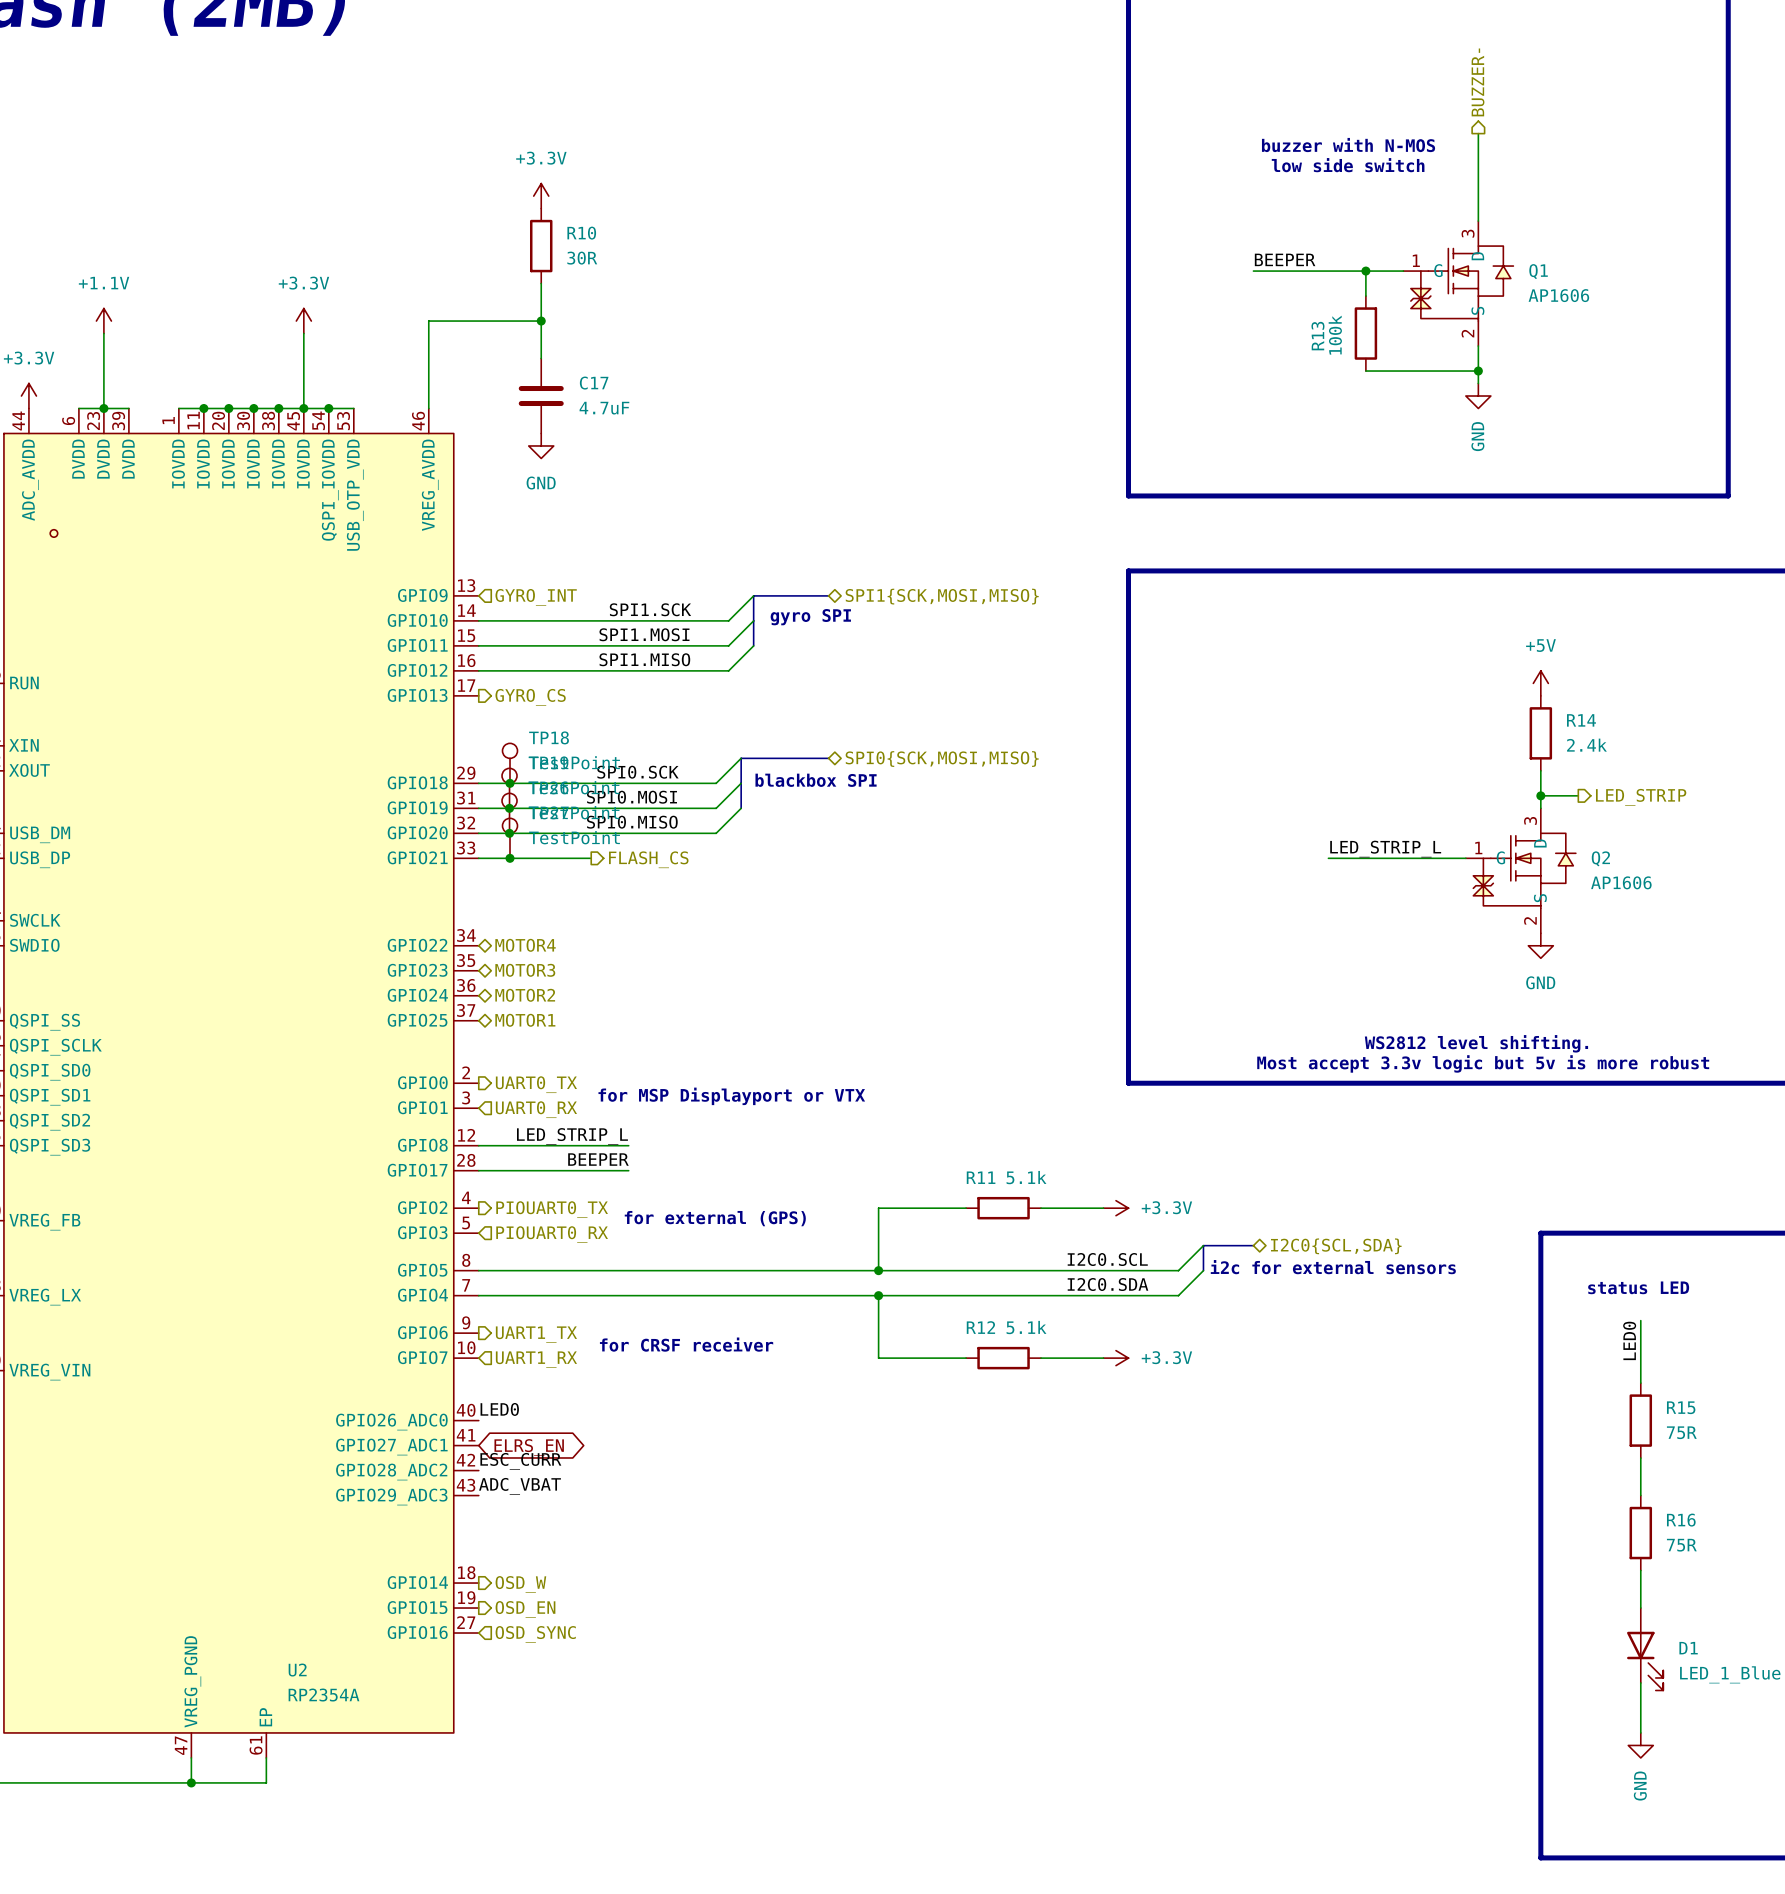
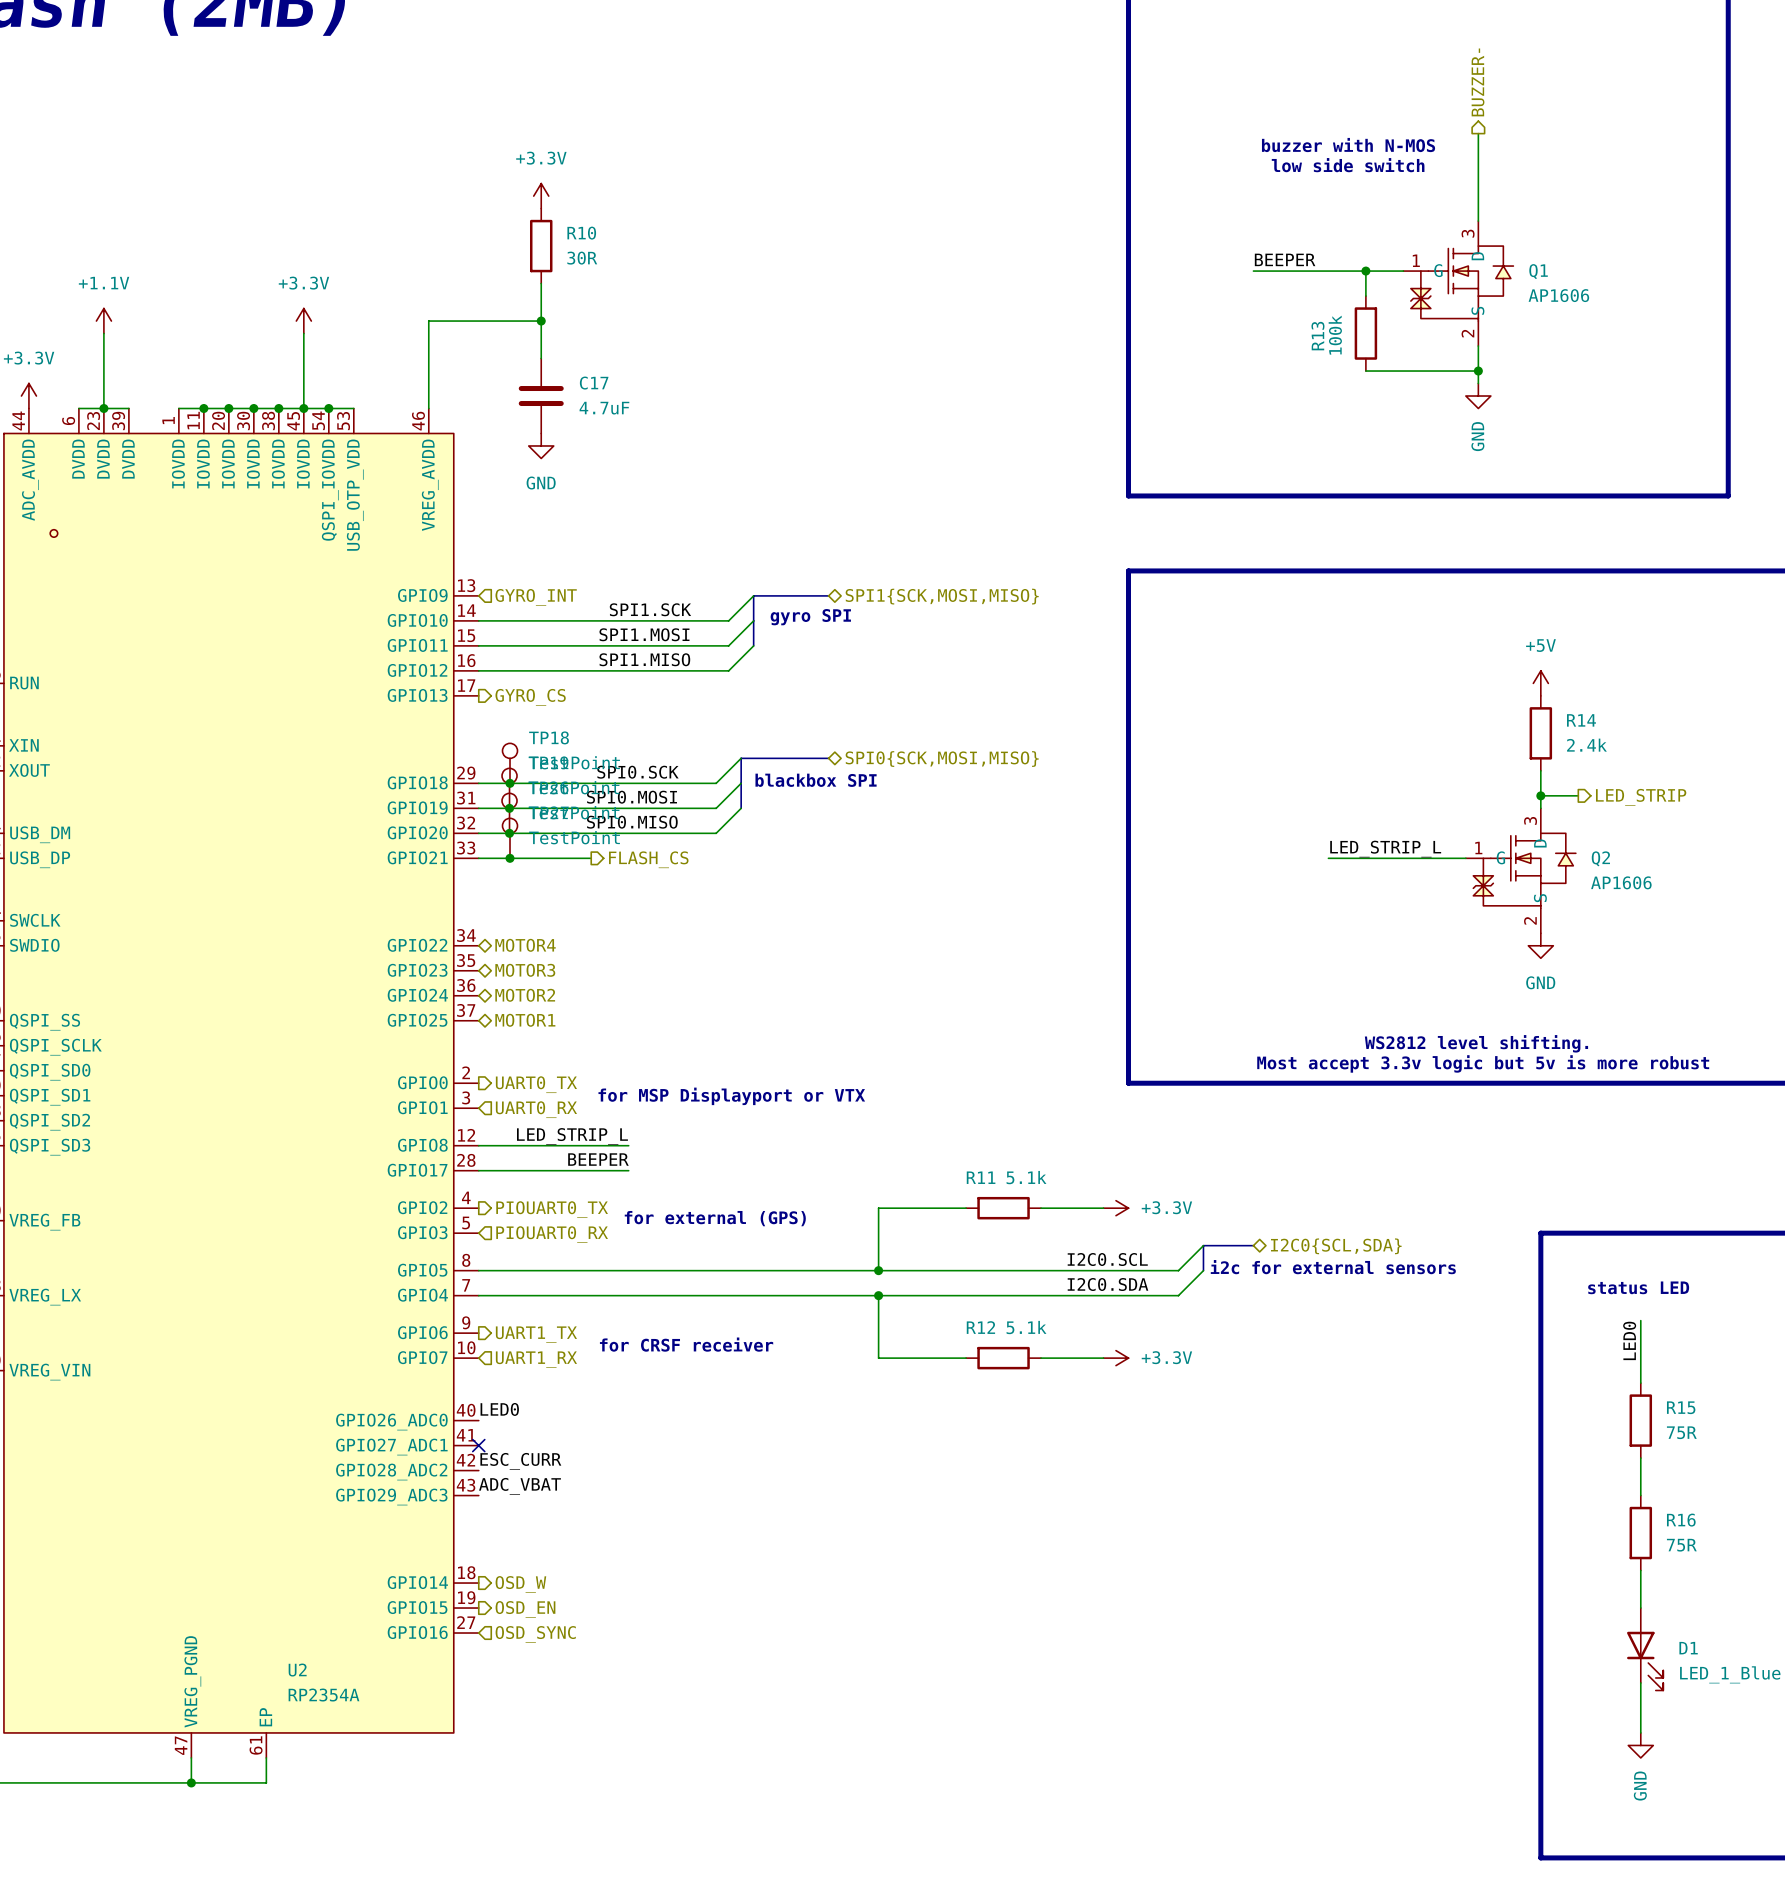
no-connect mark: none -> (478, 1445)
global label: ELRS_EN (529, 1447) -> none

